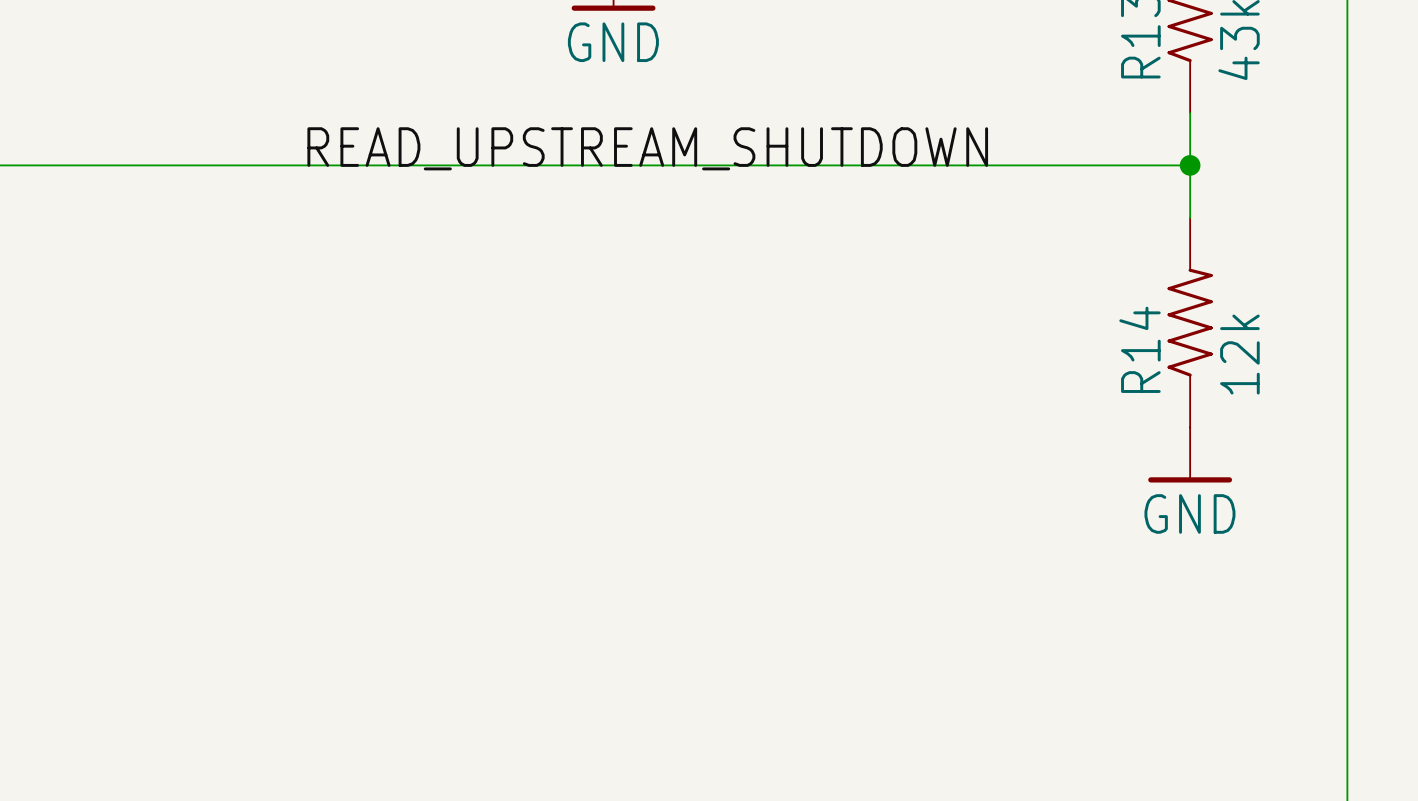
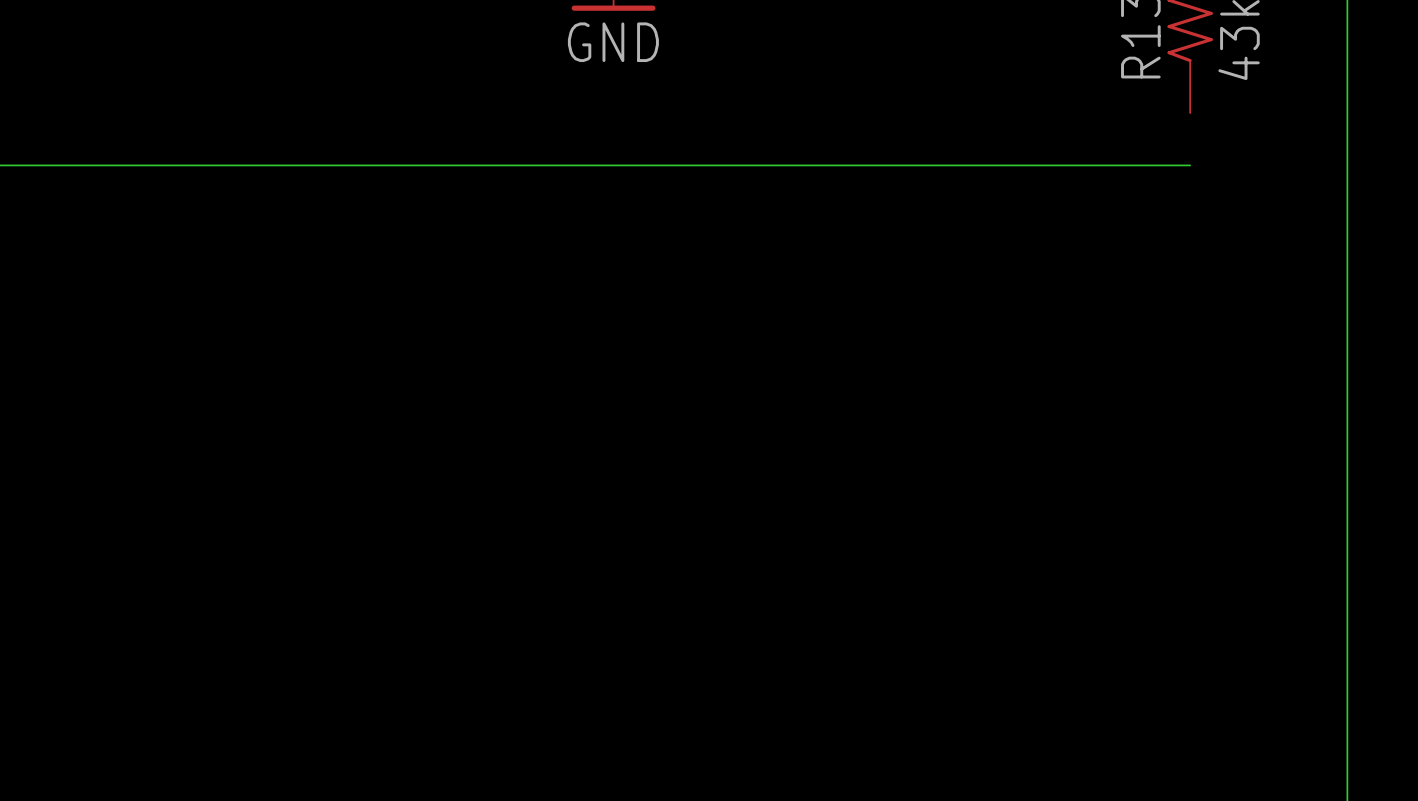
wire: (1190, 112) (1190, 217) -> none
label: READ_UPSTREAM_SHUTDOWN (647, 148) -> none
junction: (1190, 165) -> none
R14: 12k (1190, 322) -> none
power symbol: GND (1190, 455) -> none

